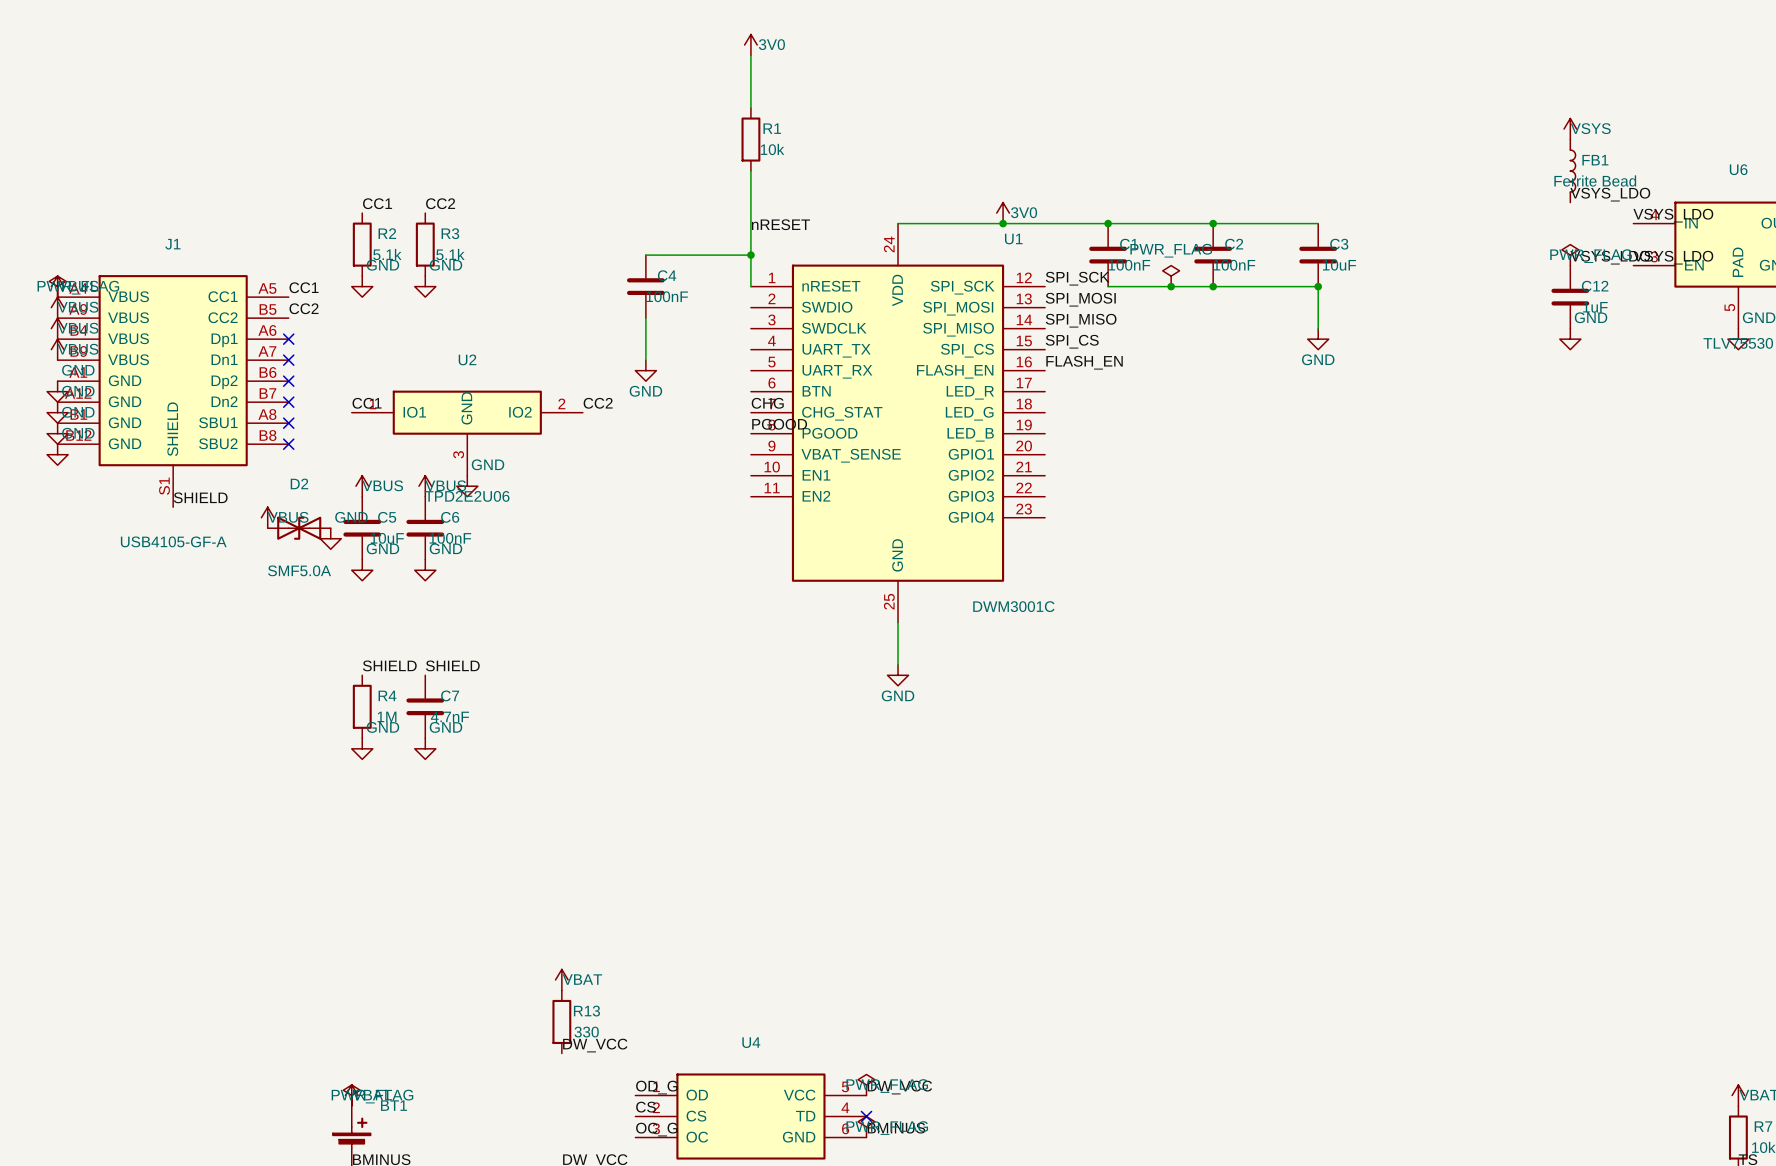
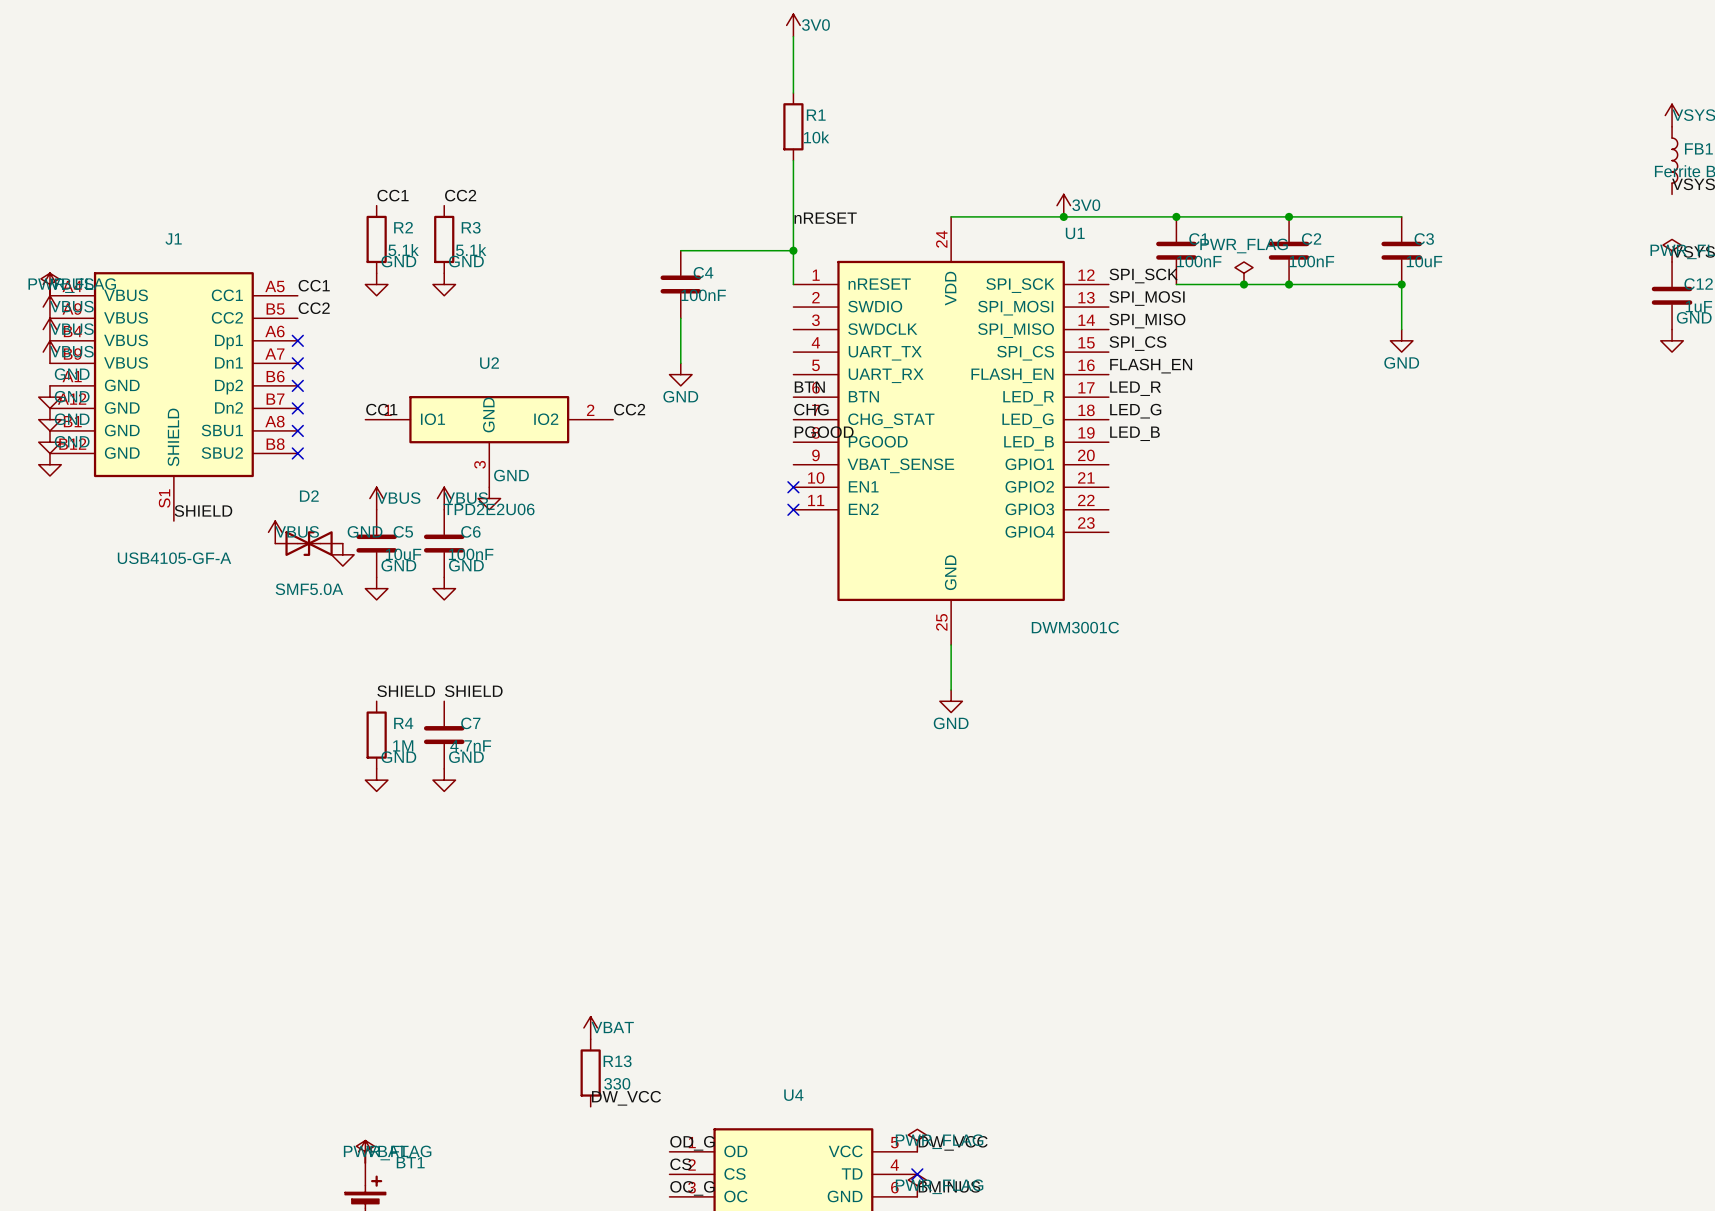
label: none -> BTN (809, 387)
label: none -> LED_R (1135, 388)
label: none -> LED_G (1135, 411)
label: none -> LED_B (1135, 433)
no-connect mark: none -> (793, 487)
no-connect mark: none -> (793, 509)

